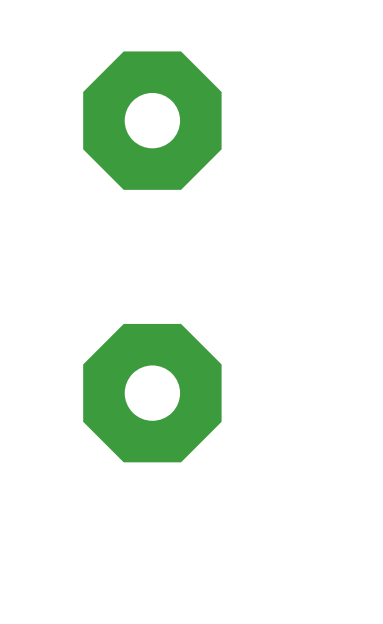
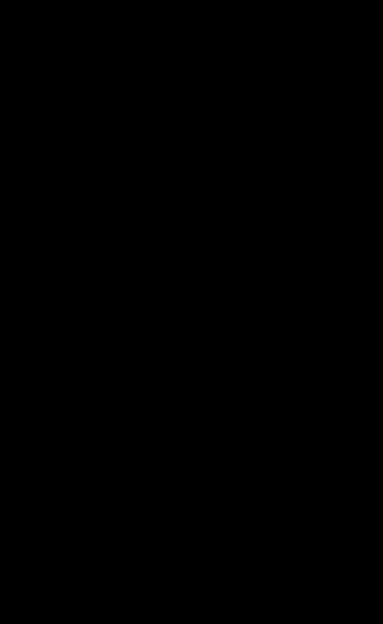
part: (152, 120) -> none
part: (152, 393) -> none

